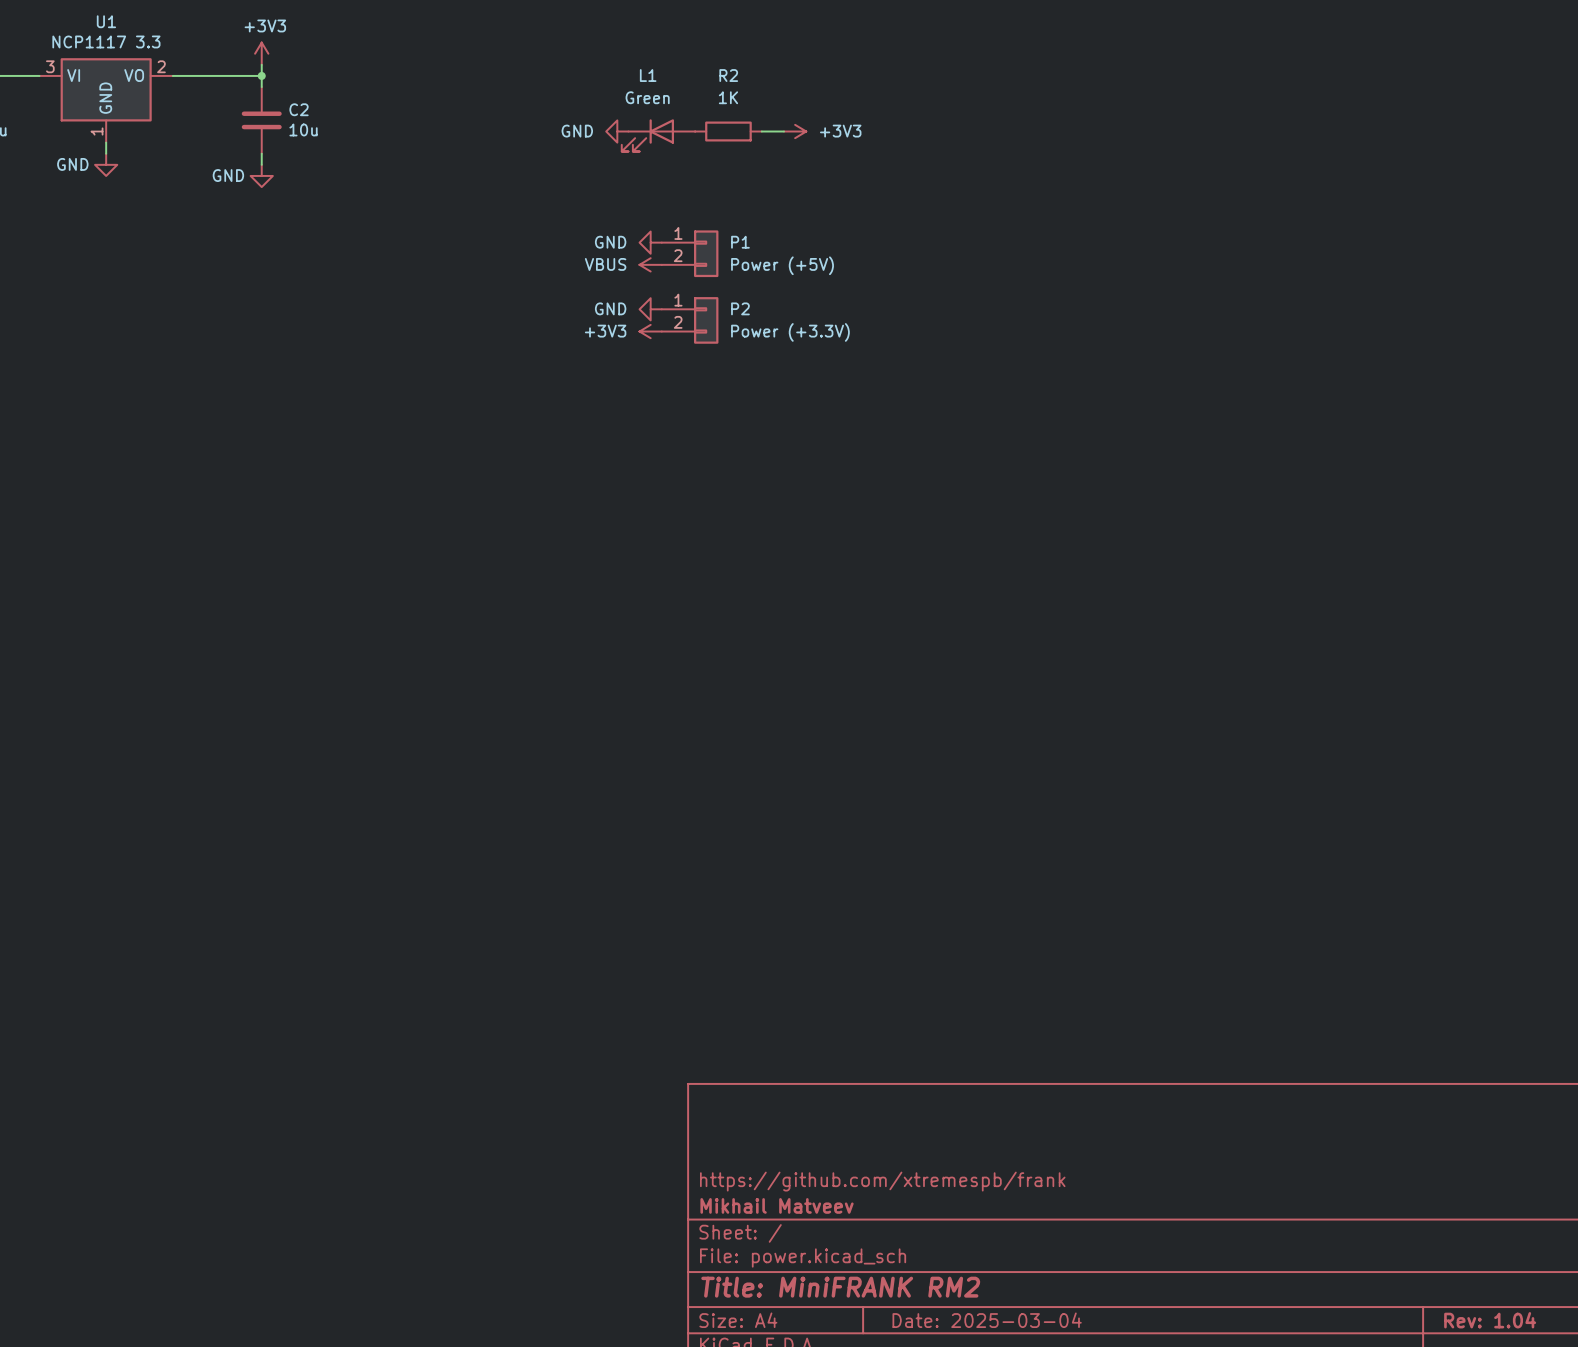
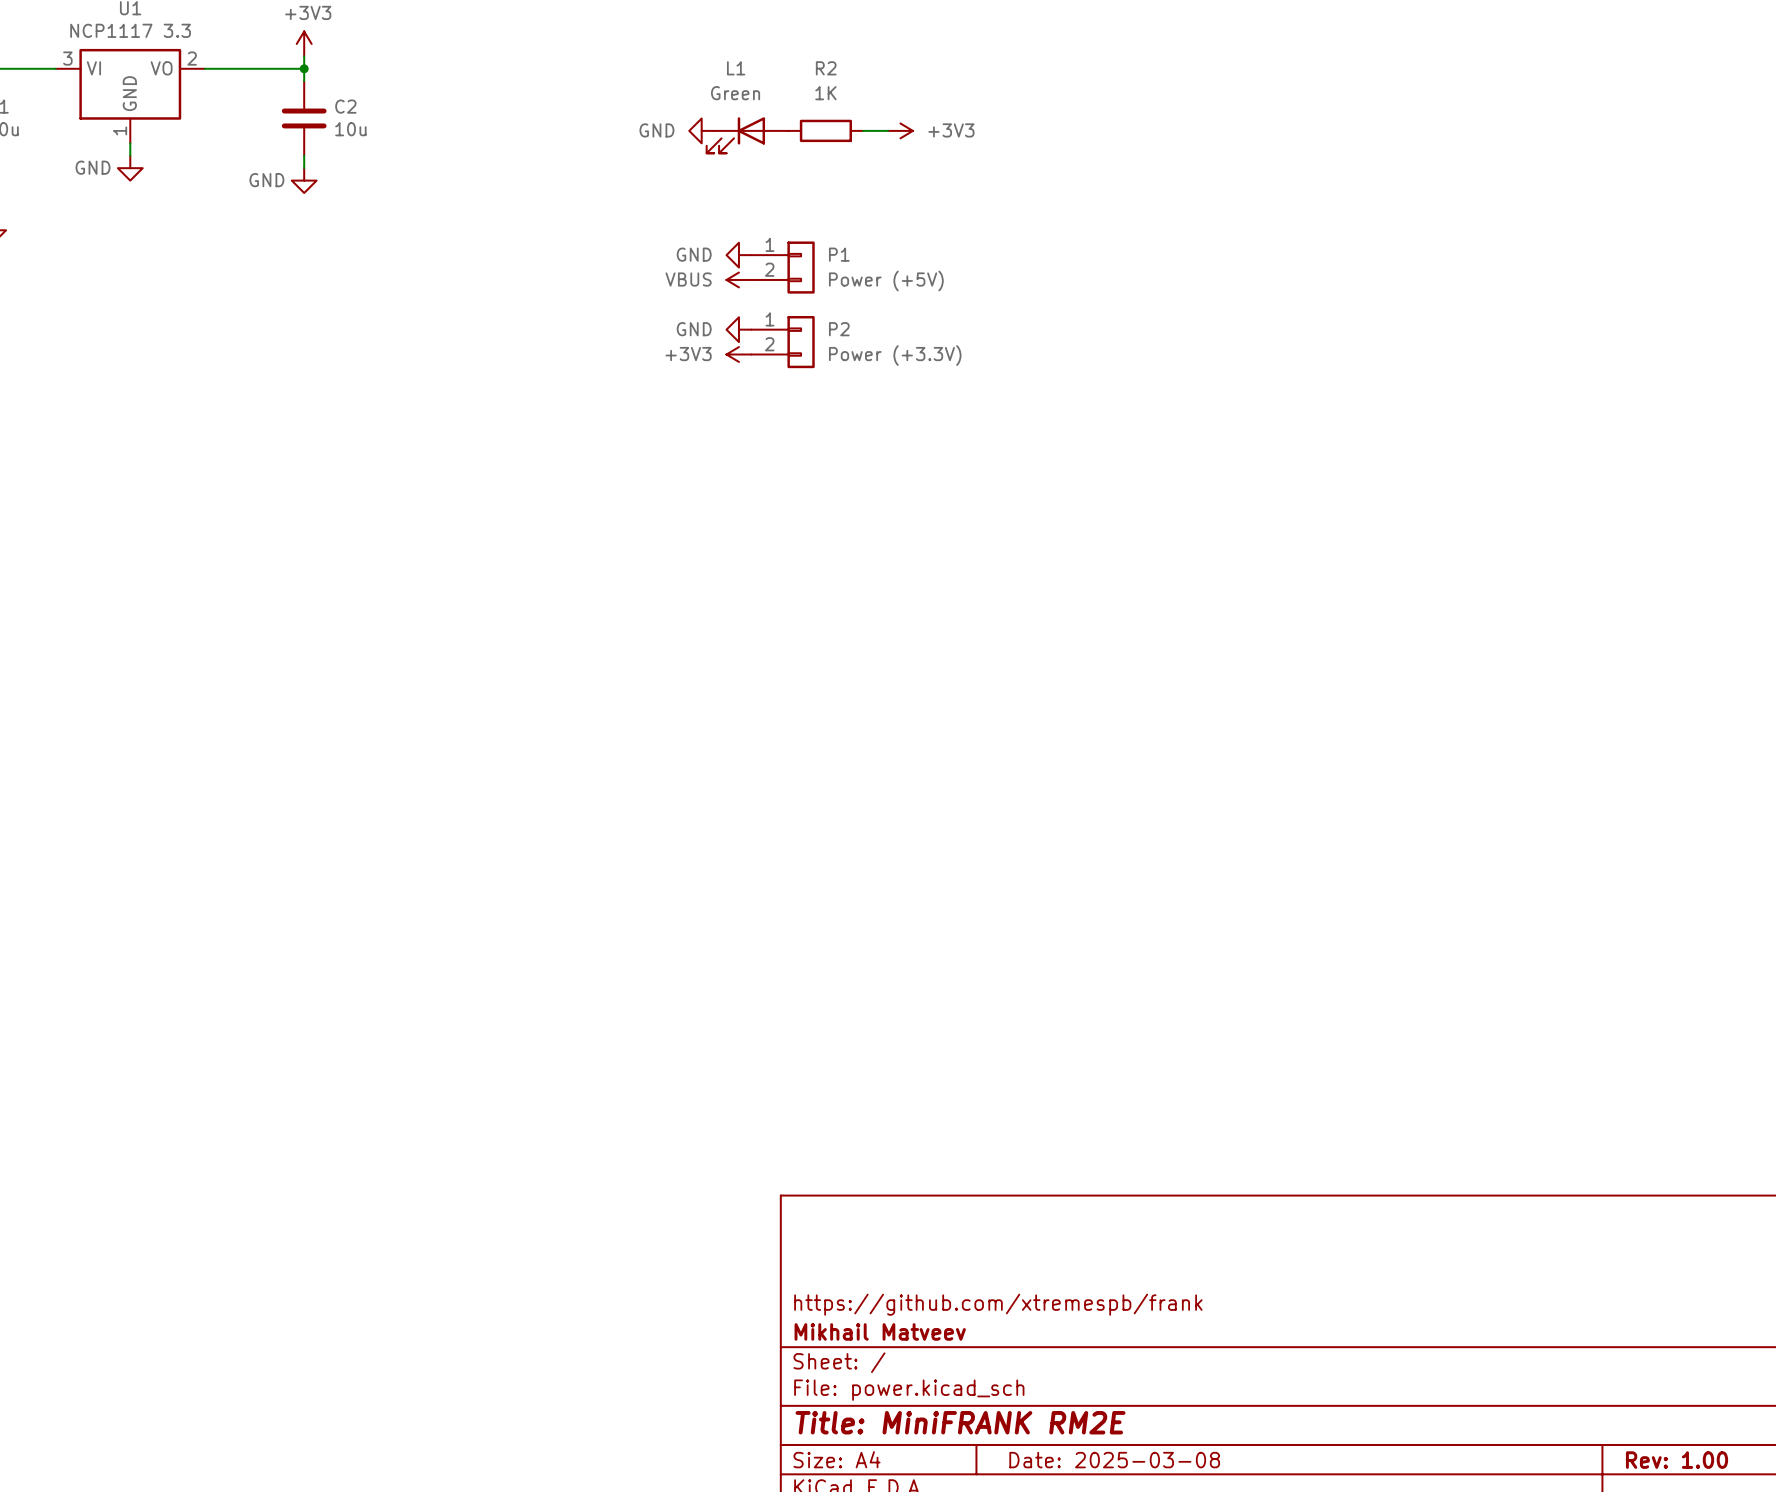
title block: Title: MiniFRANK RM2 (840, 1287) -> Title: MiniFRANK RM2E (960, 1422)
title block: Date: 2025-03-04 (987, 1320) -> Date: 2025-03-08 (1114, 1460)
title block: Rev: 1.04 (1490, 1320) -> Rev: 1.00 (1677, 1460)

